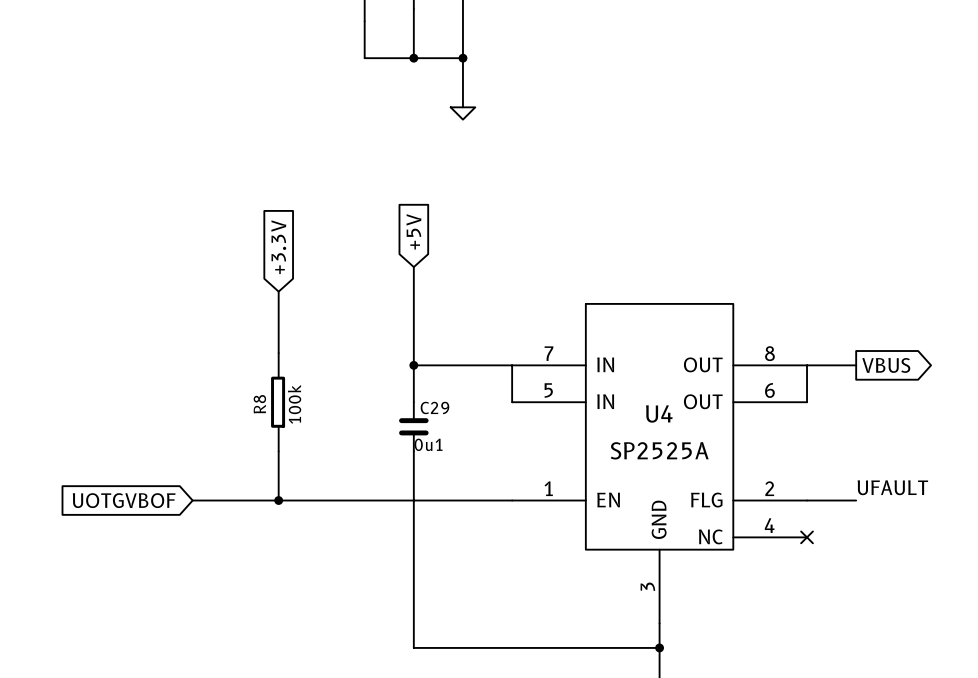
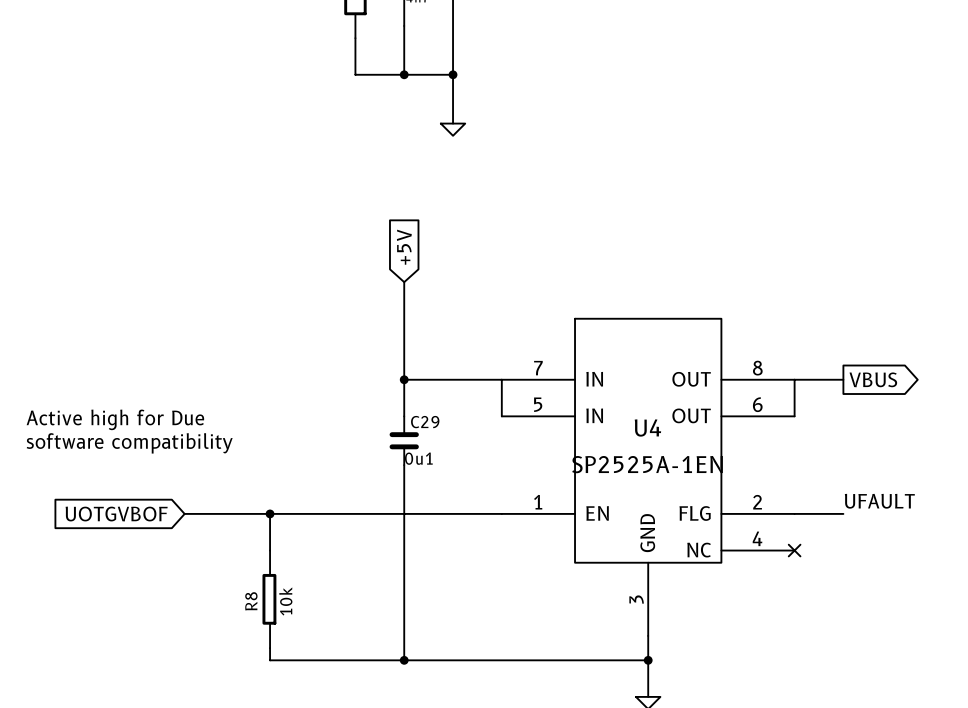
global label: +3.3V (278, 247) -> none
wire: (278, 291) (278, 353) -> none
R8 position: (278, 402) -> (269, 599)
R8 value: 100k (294, 404) -> 10k (285, 601)
text: none -> Active high for Due (115, 419)
text: none -> software compatibility (129, 443)
U4 value: SP2525A (659, 450) -> SP2525A-1EN (647, 464)
wire: (278, 451) (278, 500) -> (270, 550) (270, 513)
wire: none -> (270, 648) (270, 660) (404, 660)
junction: none -> (404, 660)

